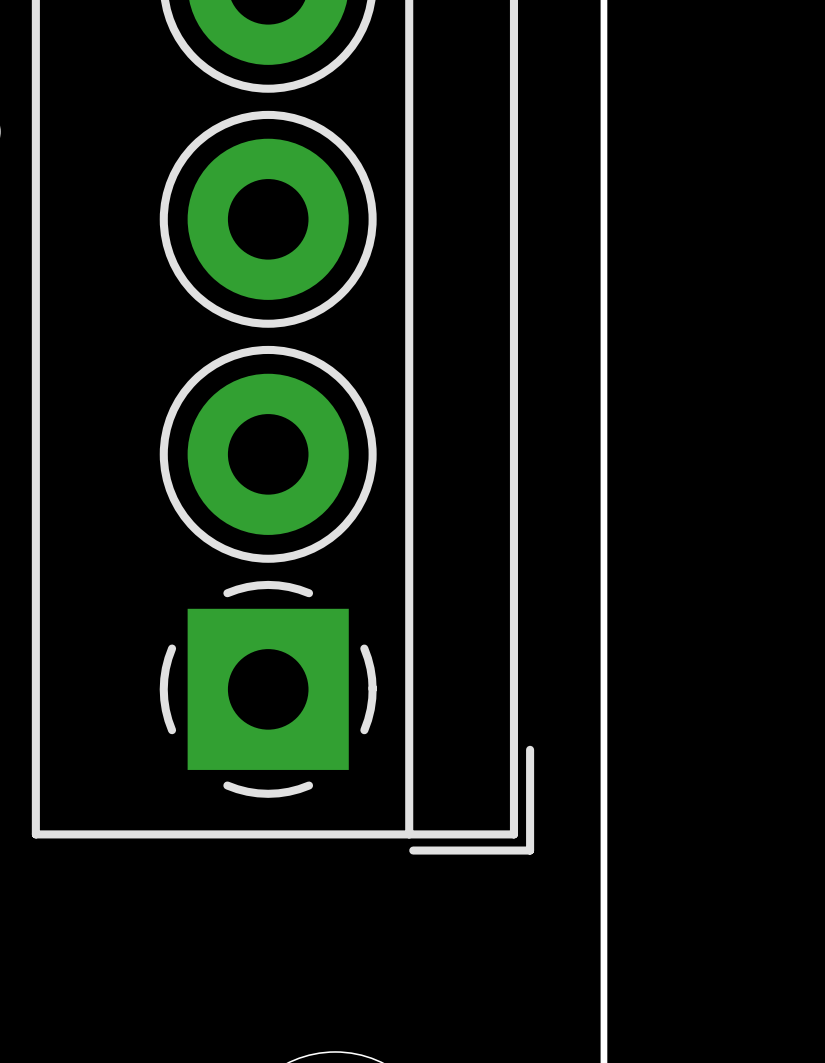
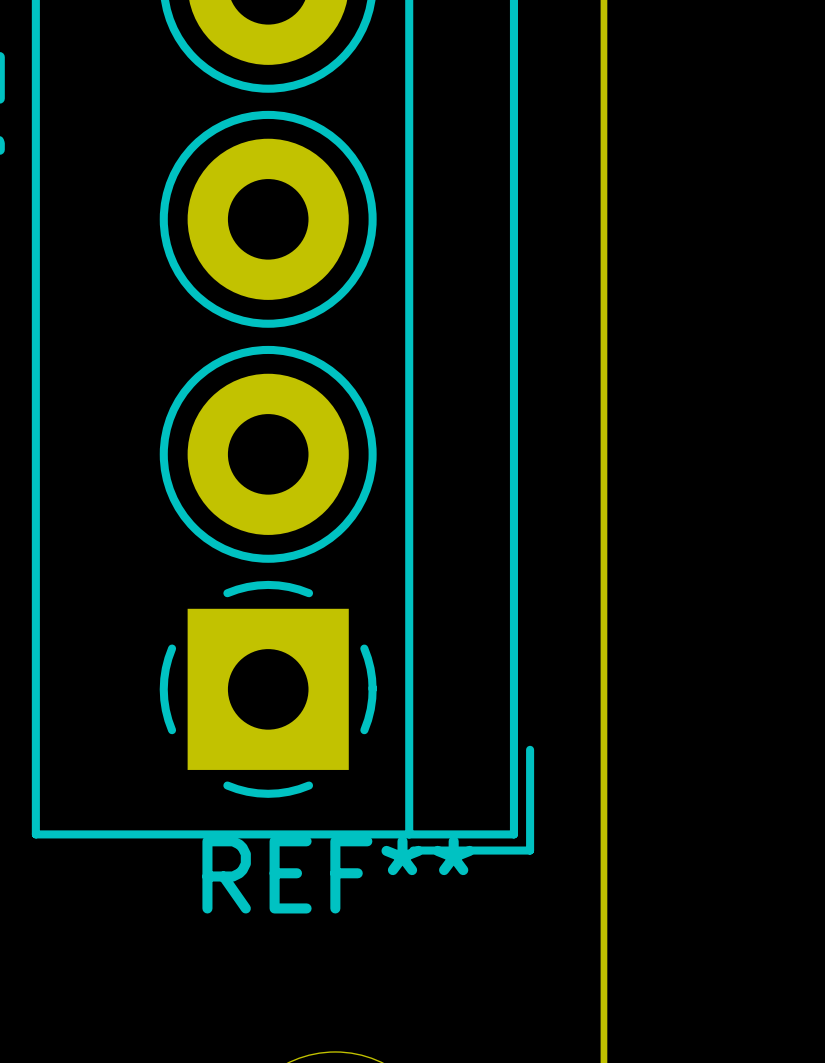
REF** name: none -> REF** (338, 874)

